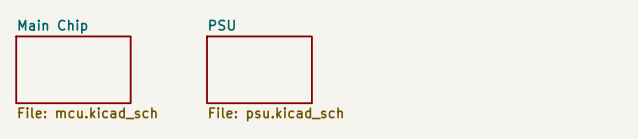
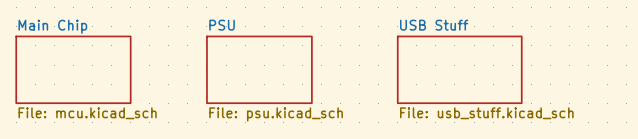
sheet USB Stuff: none -> File: usb_stuff.kicad_sch (459, 69)

